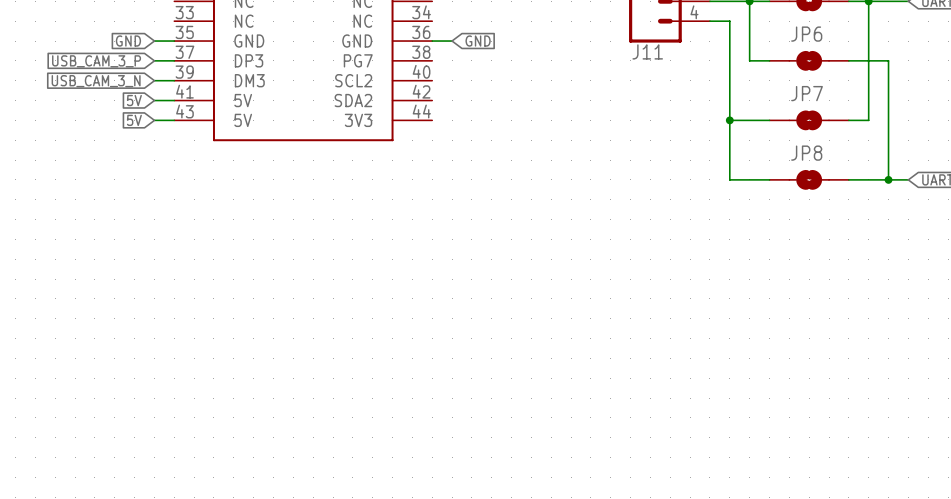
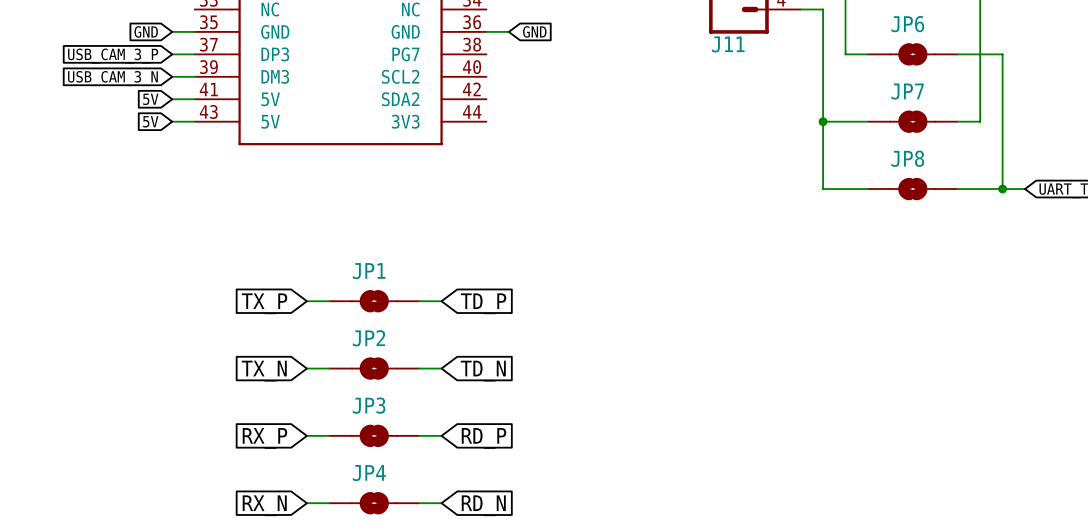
global label: none -> TX_P (264, 303)
wire: none -> (306, 301) (329, 301)
JP1: none -> (374, 301)
wire: none -> (419, 301) (441, 301)
global label: none -> TD_P (483, 303)
wire: none -> (306, 368) (329, 368)
JP2: none -> (374, 368)
wire: none -> (419, 368) (441, 368)
global label: none -> TX_N (264, 371)
global label: none -> TD_N (483, 371)
global label: none -> RX_P (264, 438)
wire: none -> (306, 435) (329, 435)
JP3: none -> (374, 435)
wire: none -> (419, 435) (441, 435)
global label: none -> RD_P (484, 438)
wire: none -> (306, 503) (329, 503)
JP4: none -> (374, 503)
wire: none -> (419, 503) (441, 503)
global label: none -> RX_N (264, 505)
global label: none -> RD_N (483, 505)

